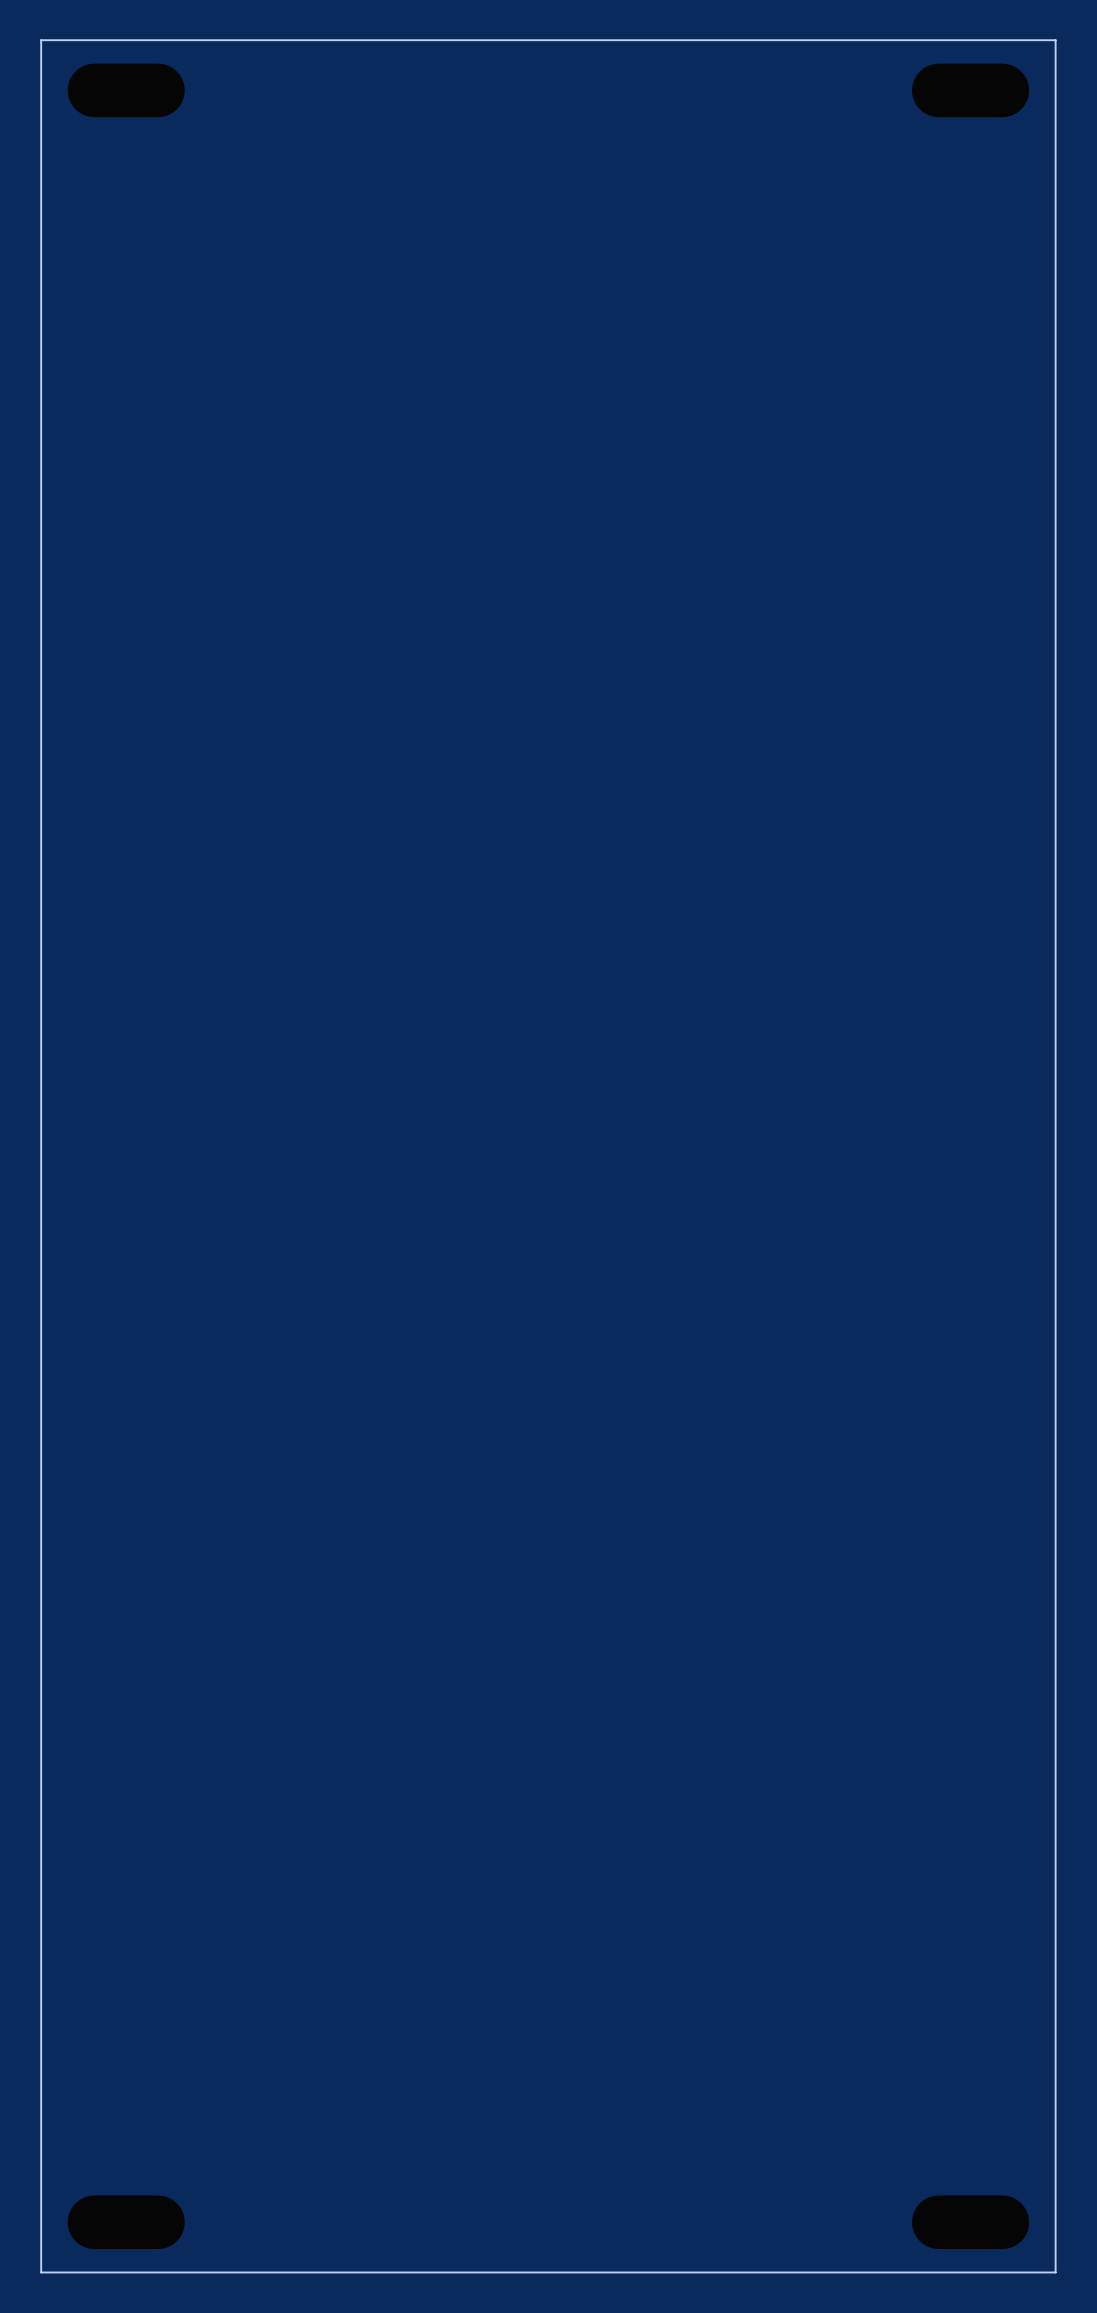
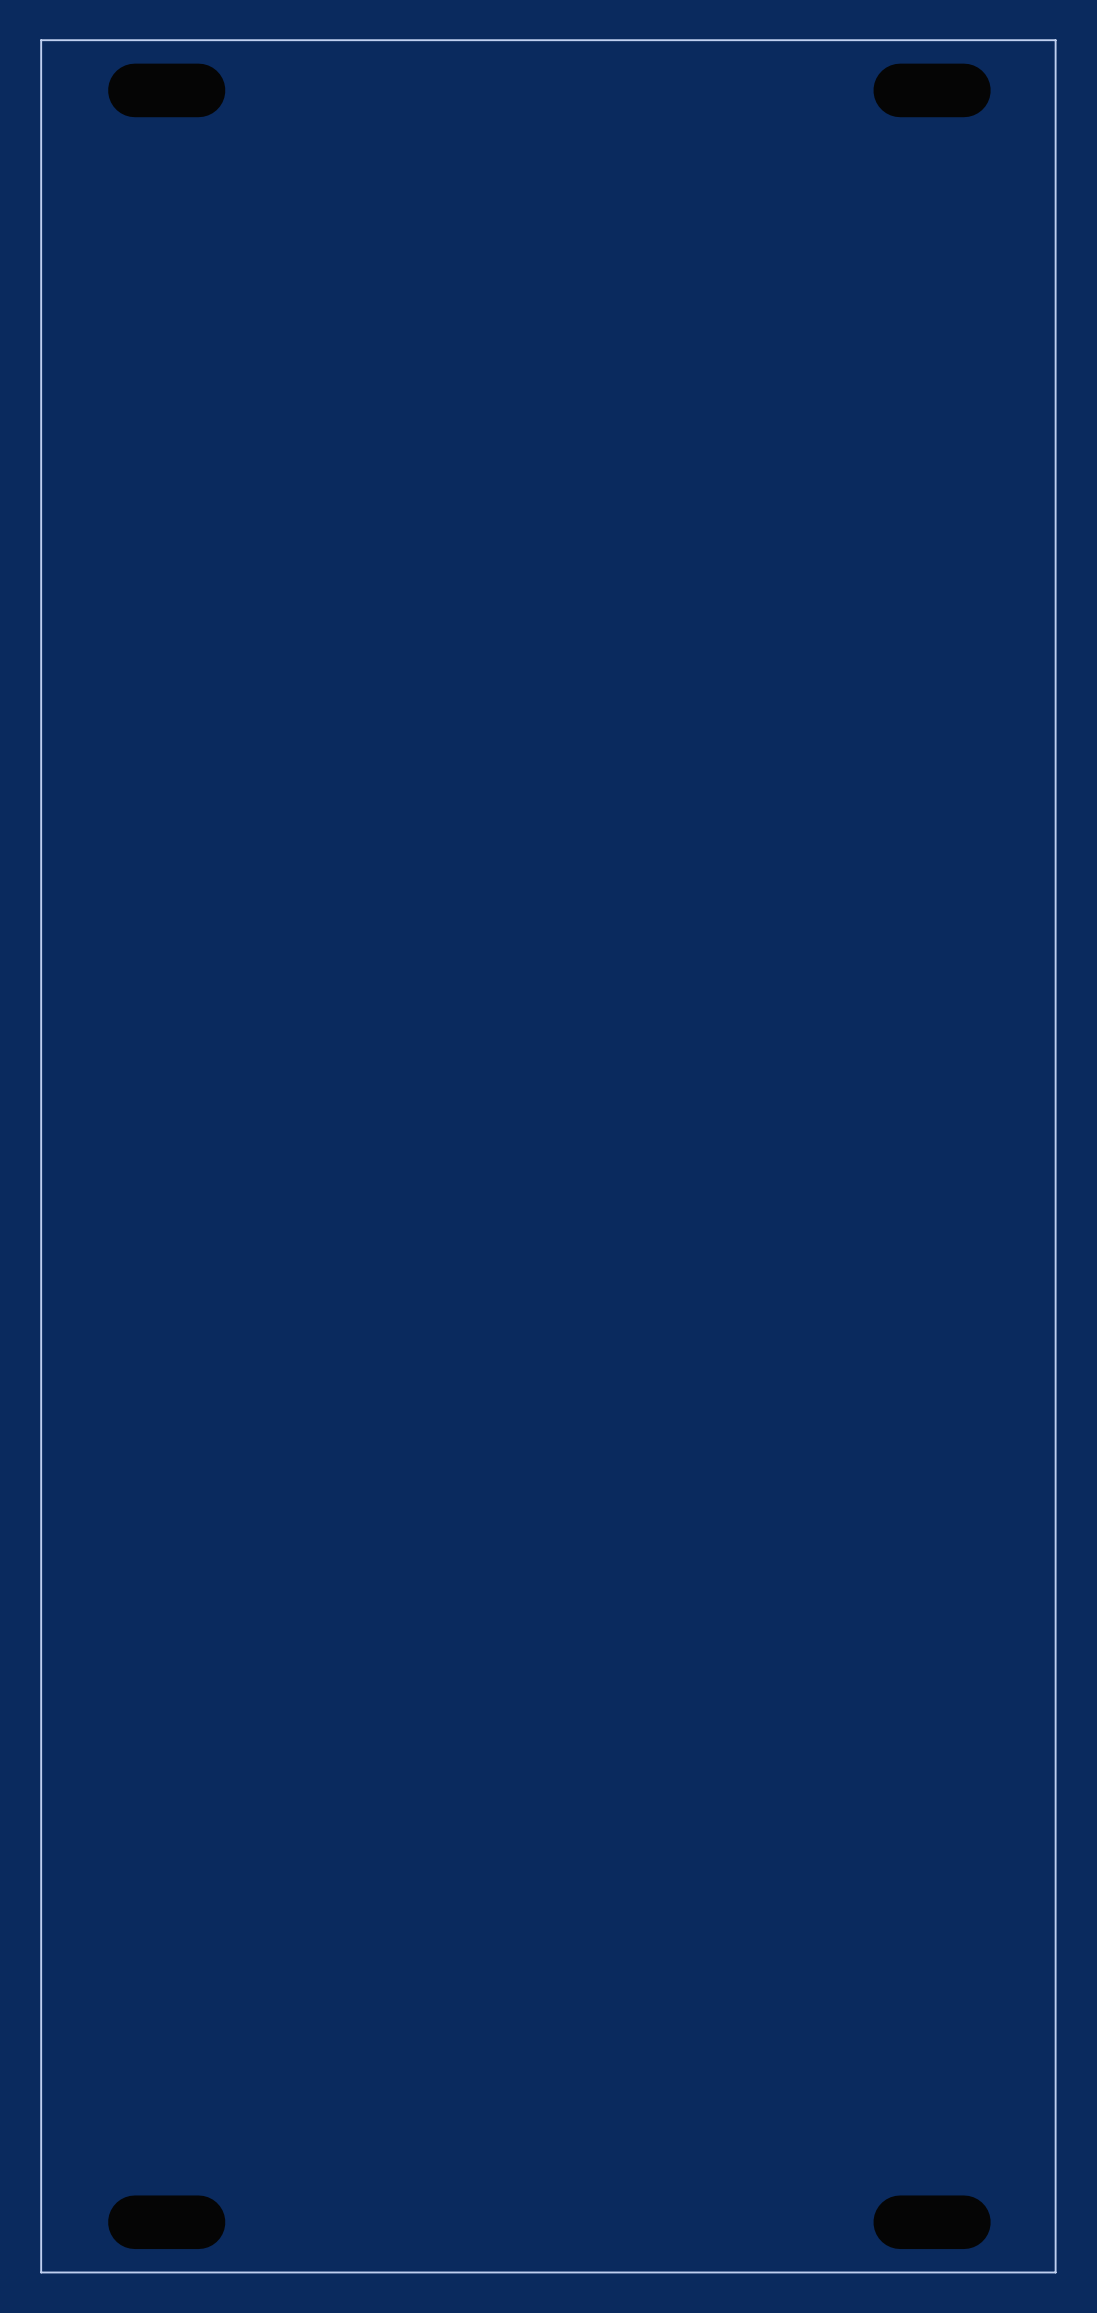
part position: (126, 90) -> (166, 90)
part position: (970, 90) -> (932, 90)
part position: (126, 2222) -> (166, 2222)
part position: (970, 2222) -> (932, 2222)

